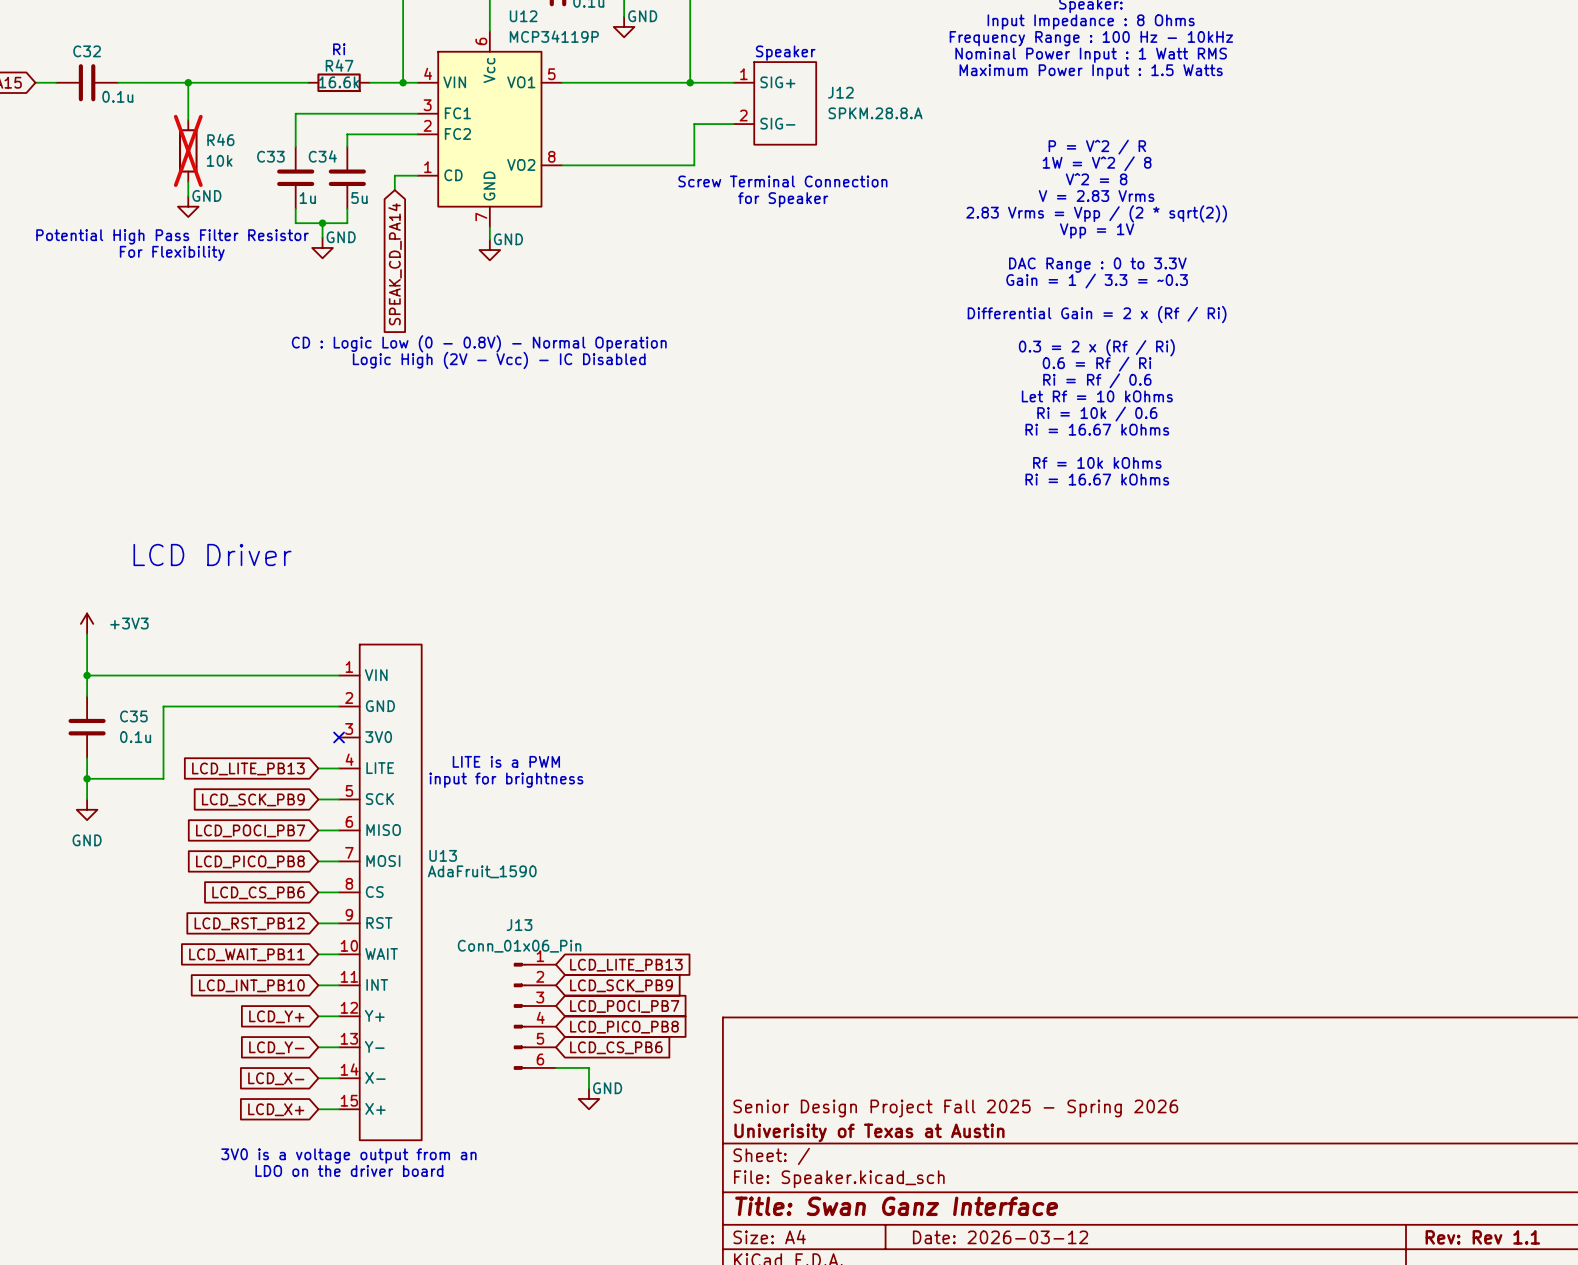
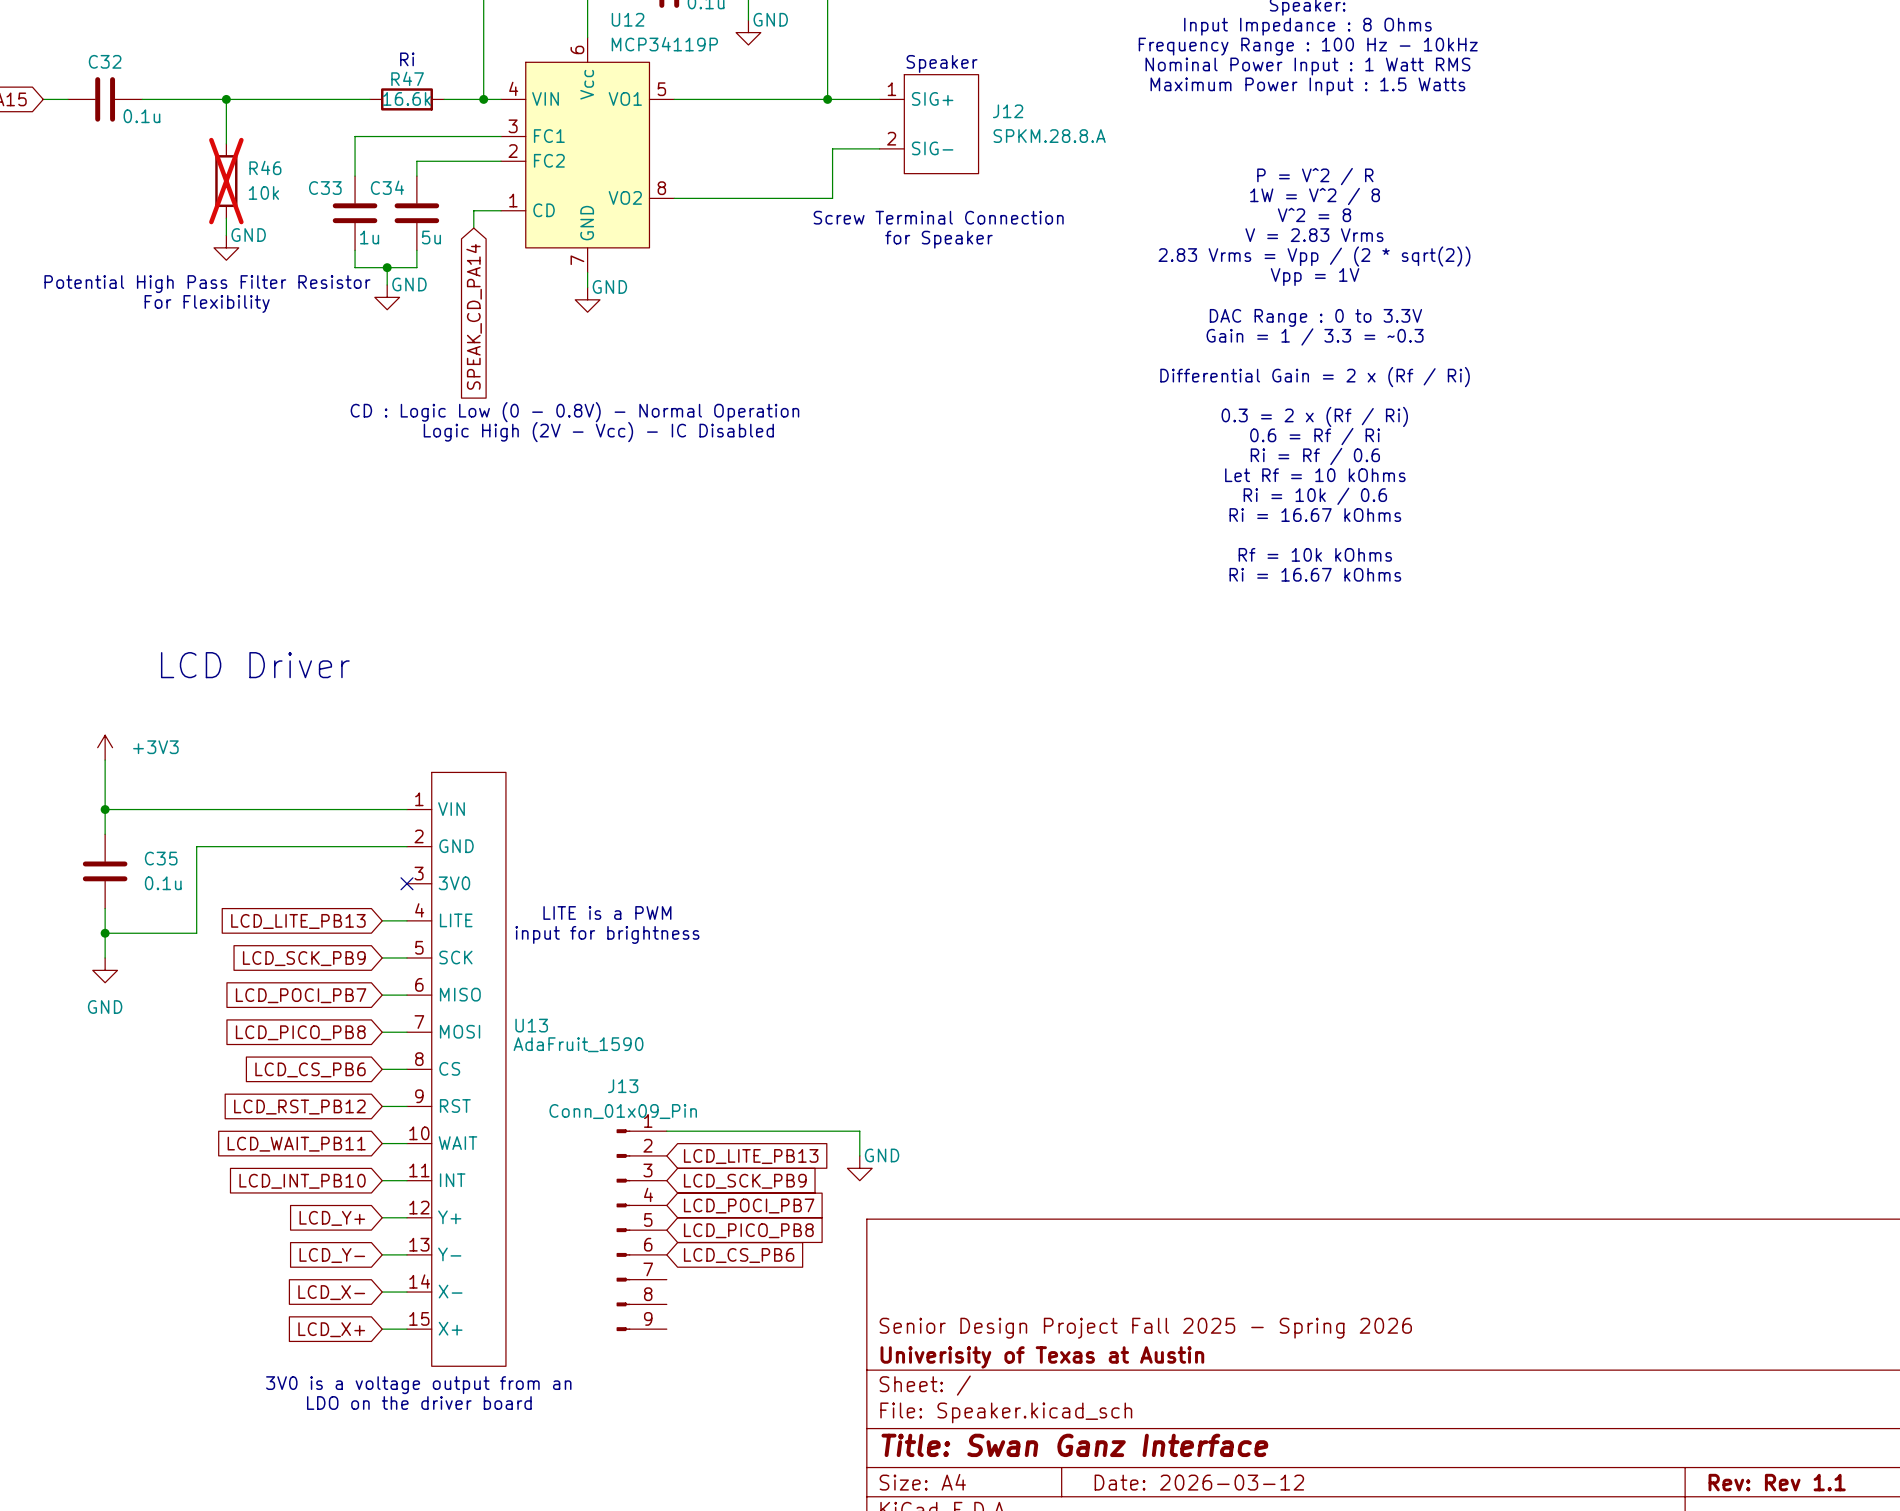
J13 name position: J13 (519, 925) -> J13 (623, 1086)
wire: none -> (666, 1131) (859, 1131) (859, 1155)
J13 value: Conn_01x06_Pin (519, 946) -> Conn_01x09_Pin (623, 1111)
J13 symbol: [514, 963, 556, 1070] -> [616, 1129, 667, 1332]
wire: (555, 1067) (588, 1067) (588, 1088) -> none
power symbol position: GND (588, 1098) -> GND (859, 1168)

